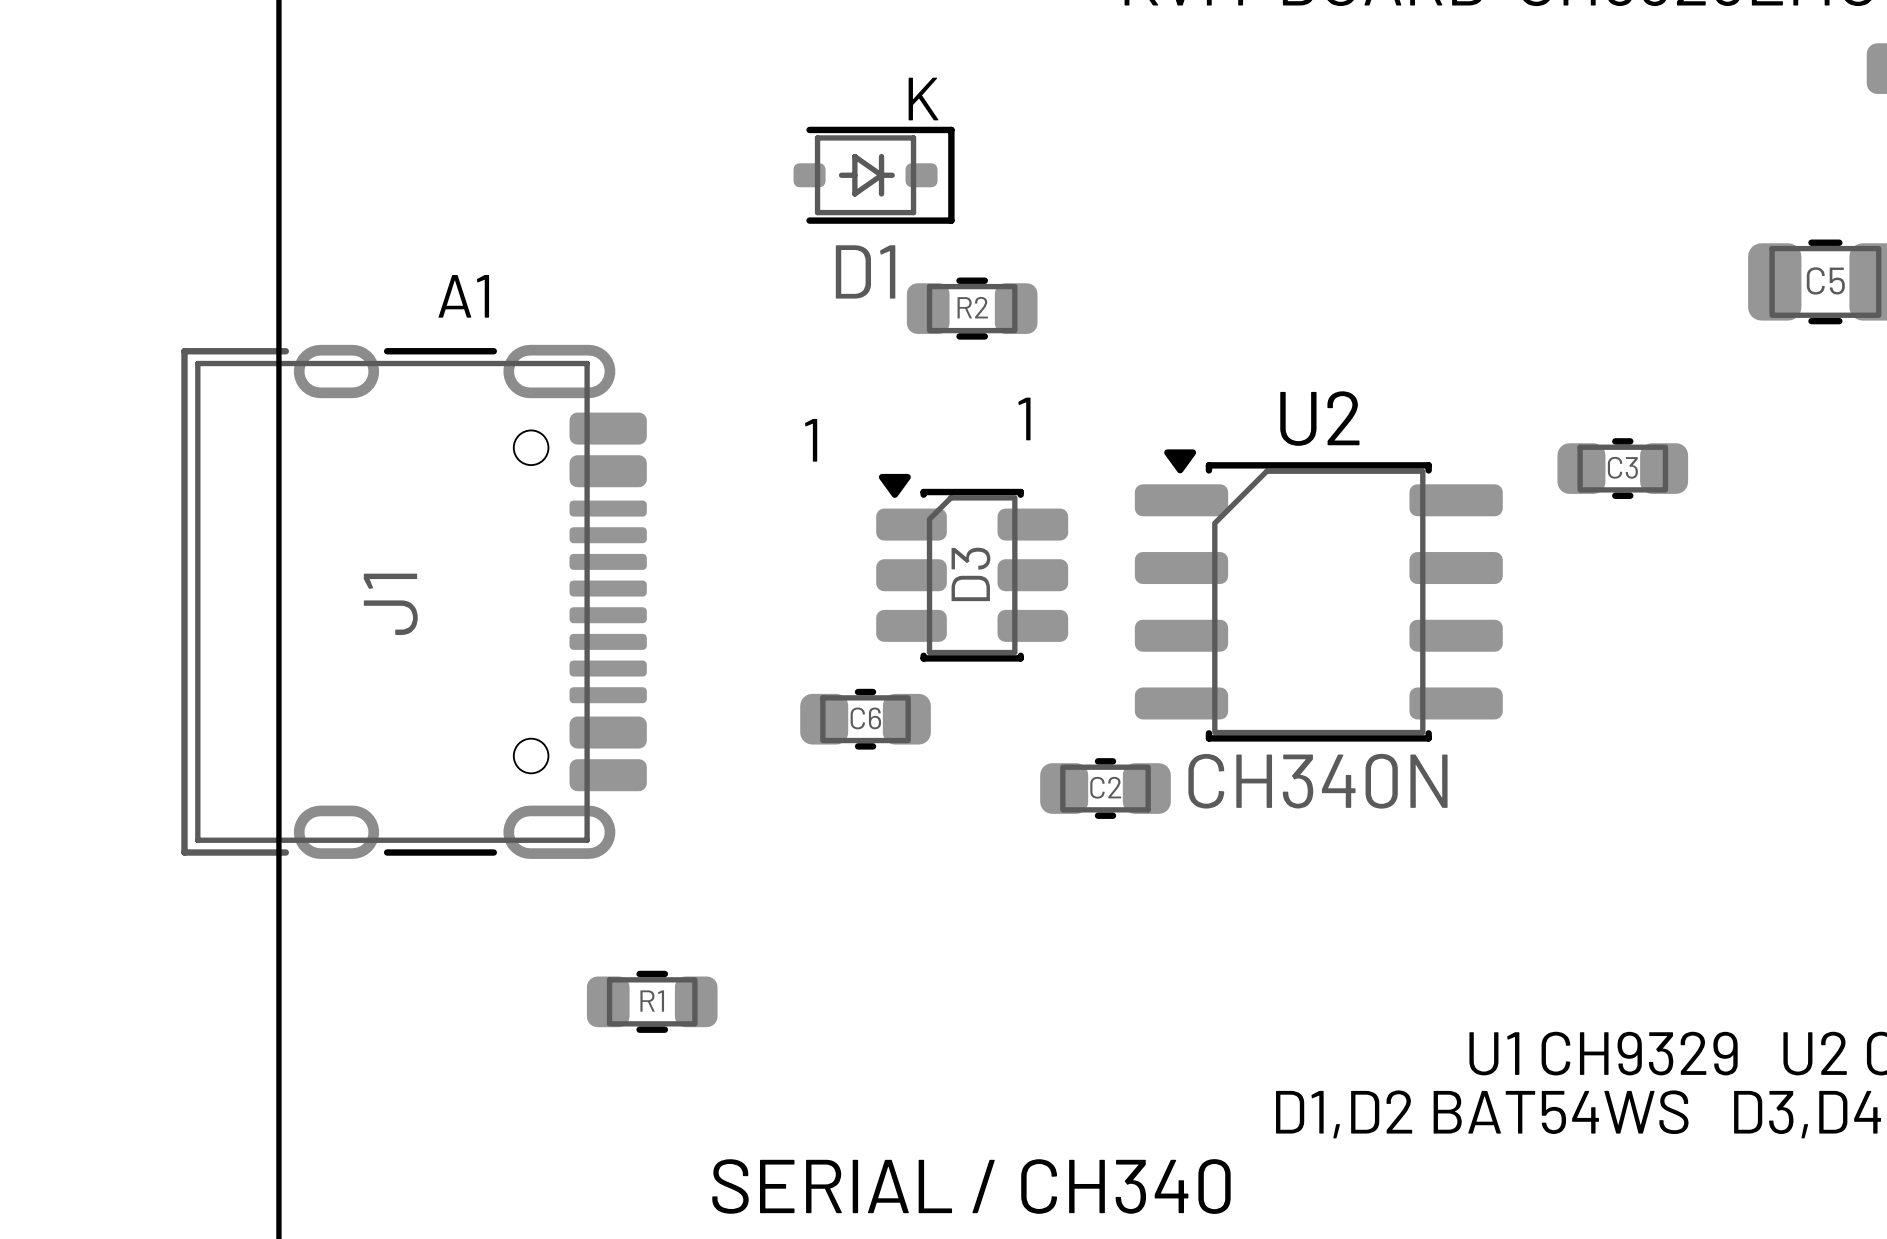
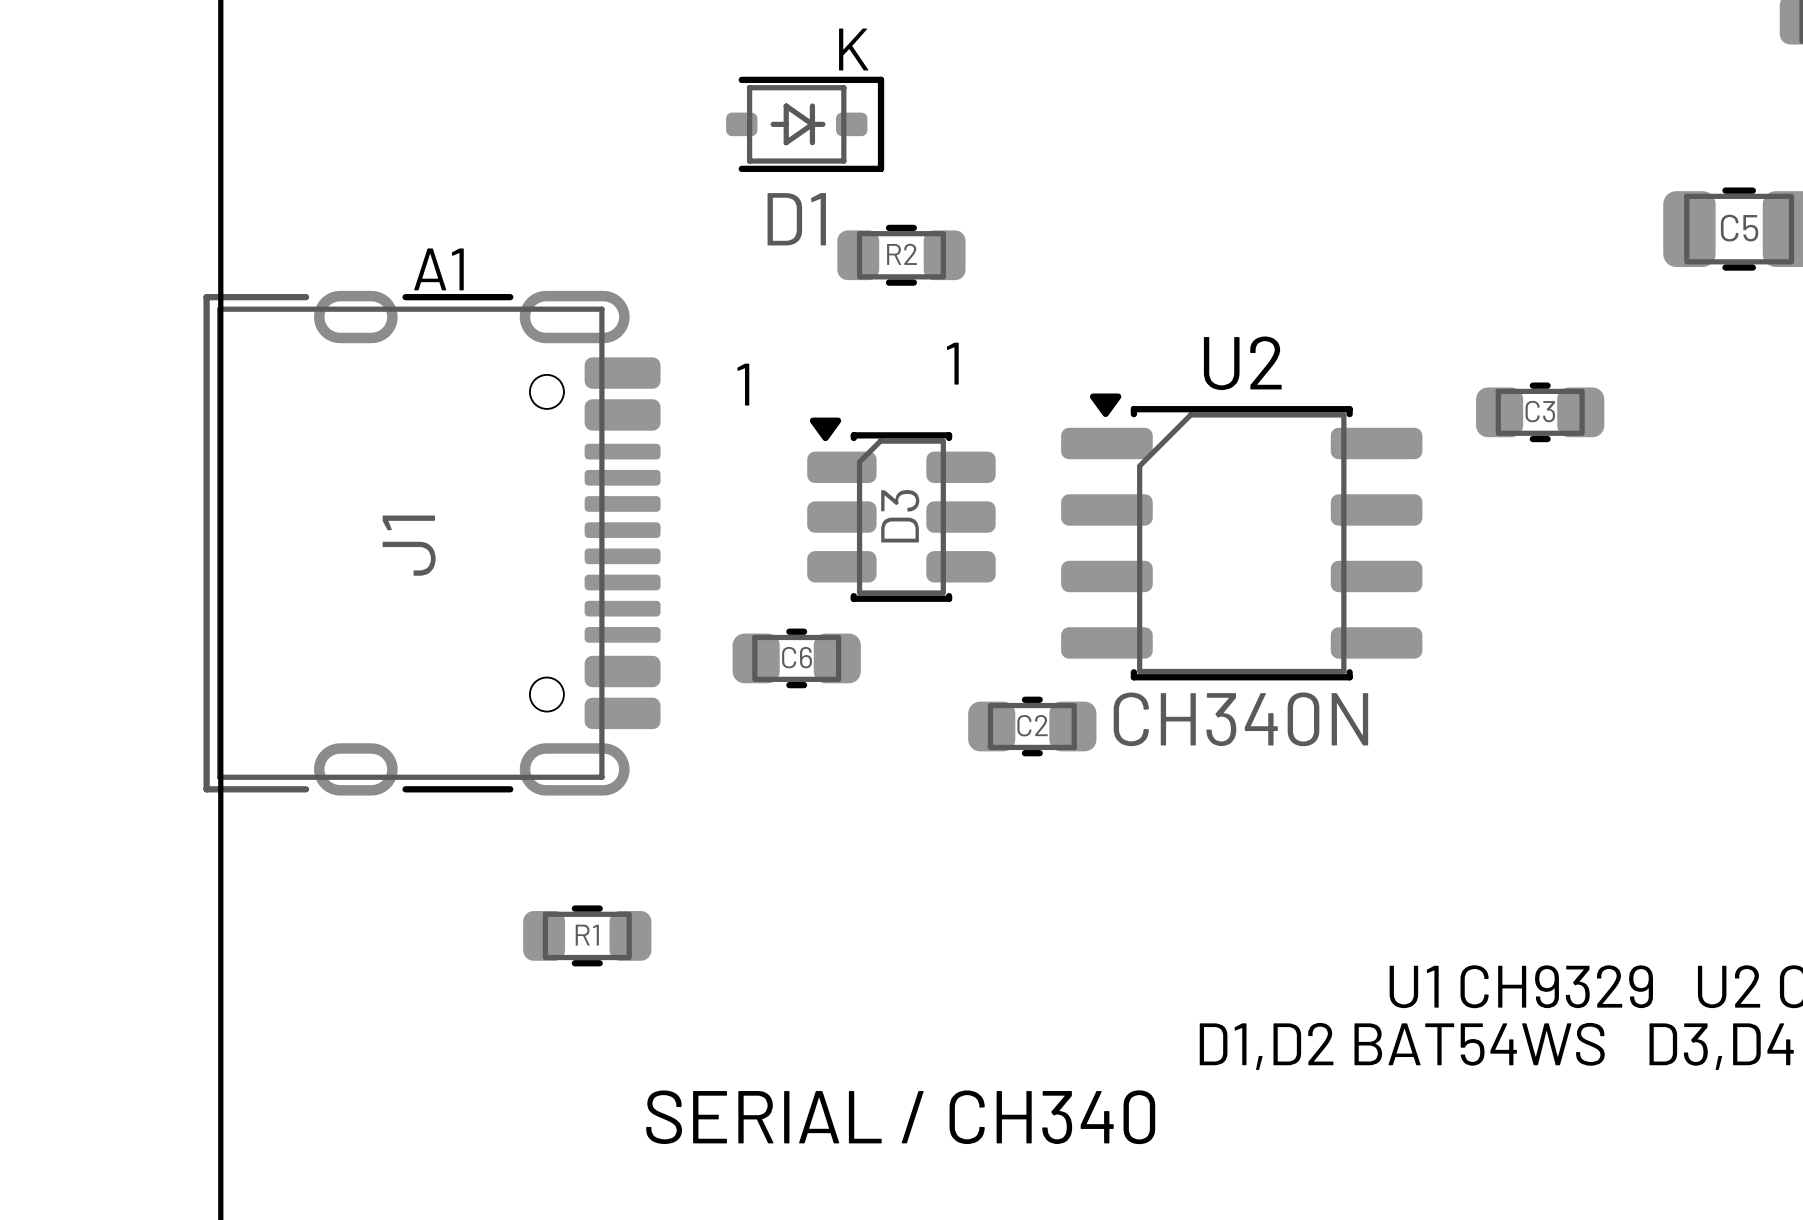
text position: A1 (463, 296) -> A1 (438, 269)
J1 position: (414, 601) -> (432, 543)

